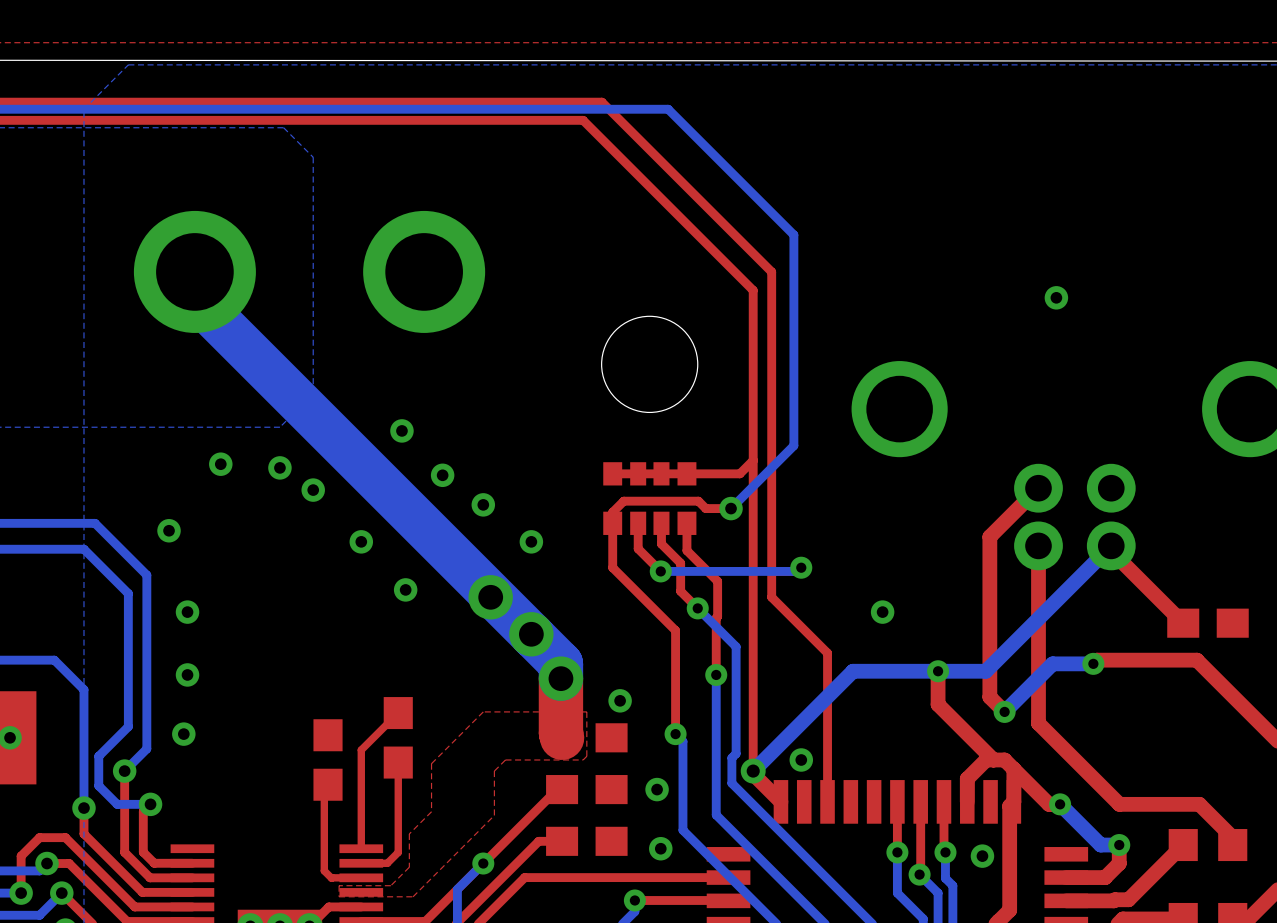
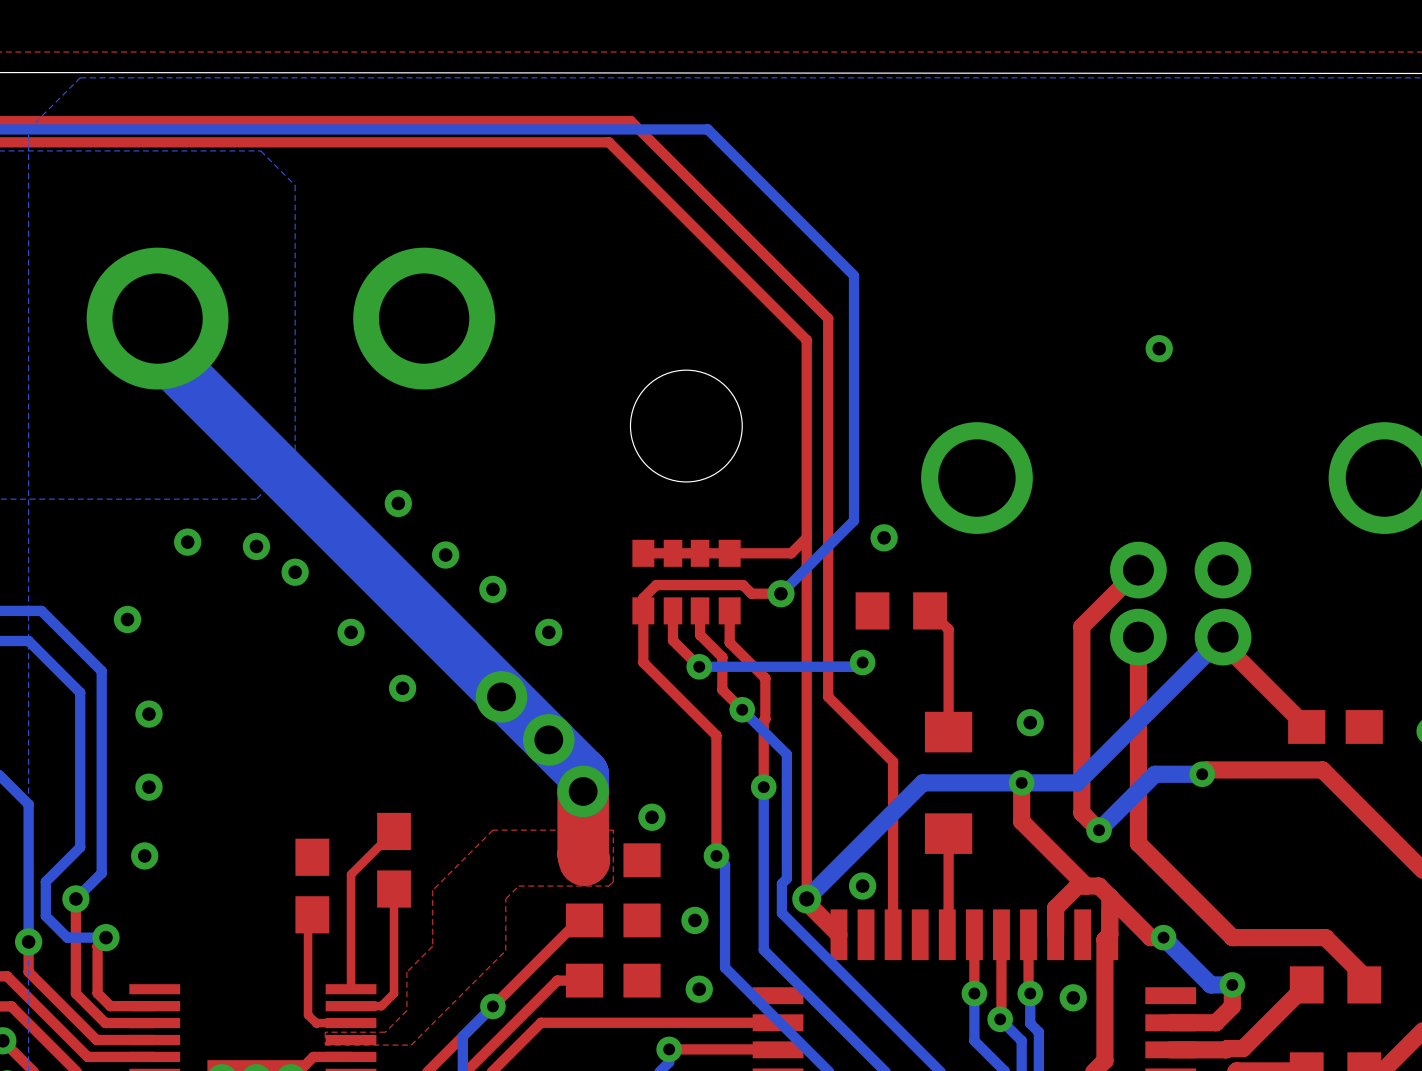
via: none -> (884, 537)
part: none -> (901, 610)
top track: none -> (930, 610) (948, 629) (948, 732)
via position: (882, 612) -> (1030, 722)
part: none -> (948, 782)
top track: none -> (948, 833) (947, 934)

